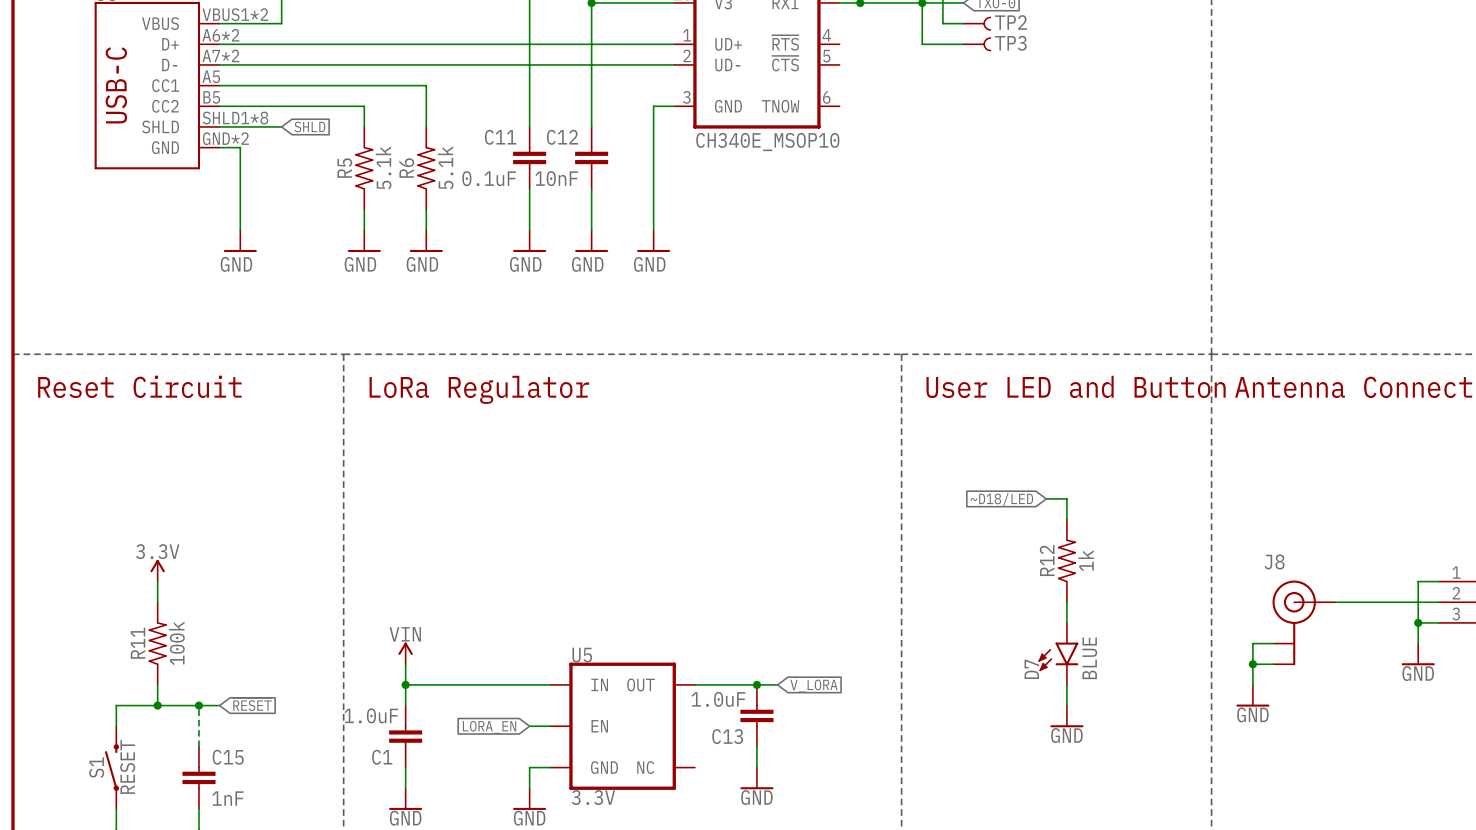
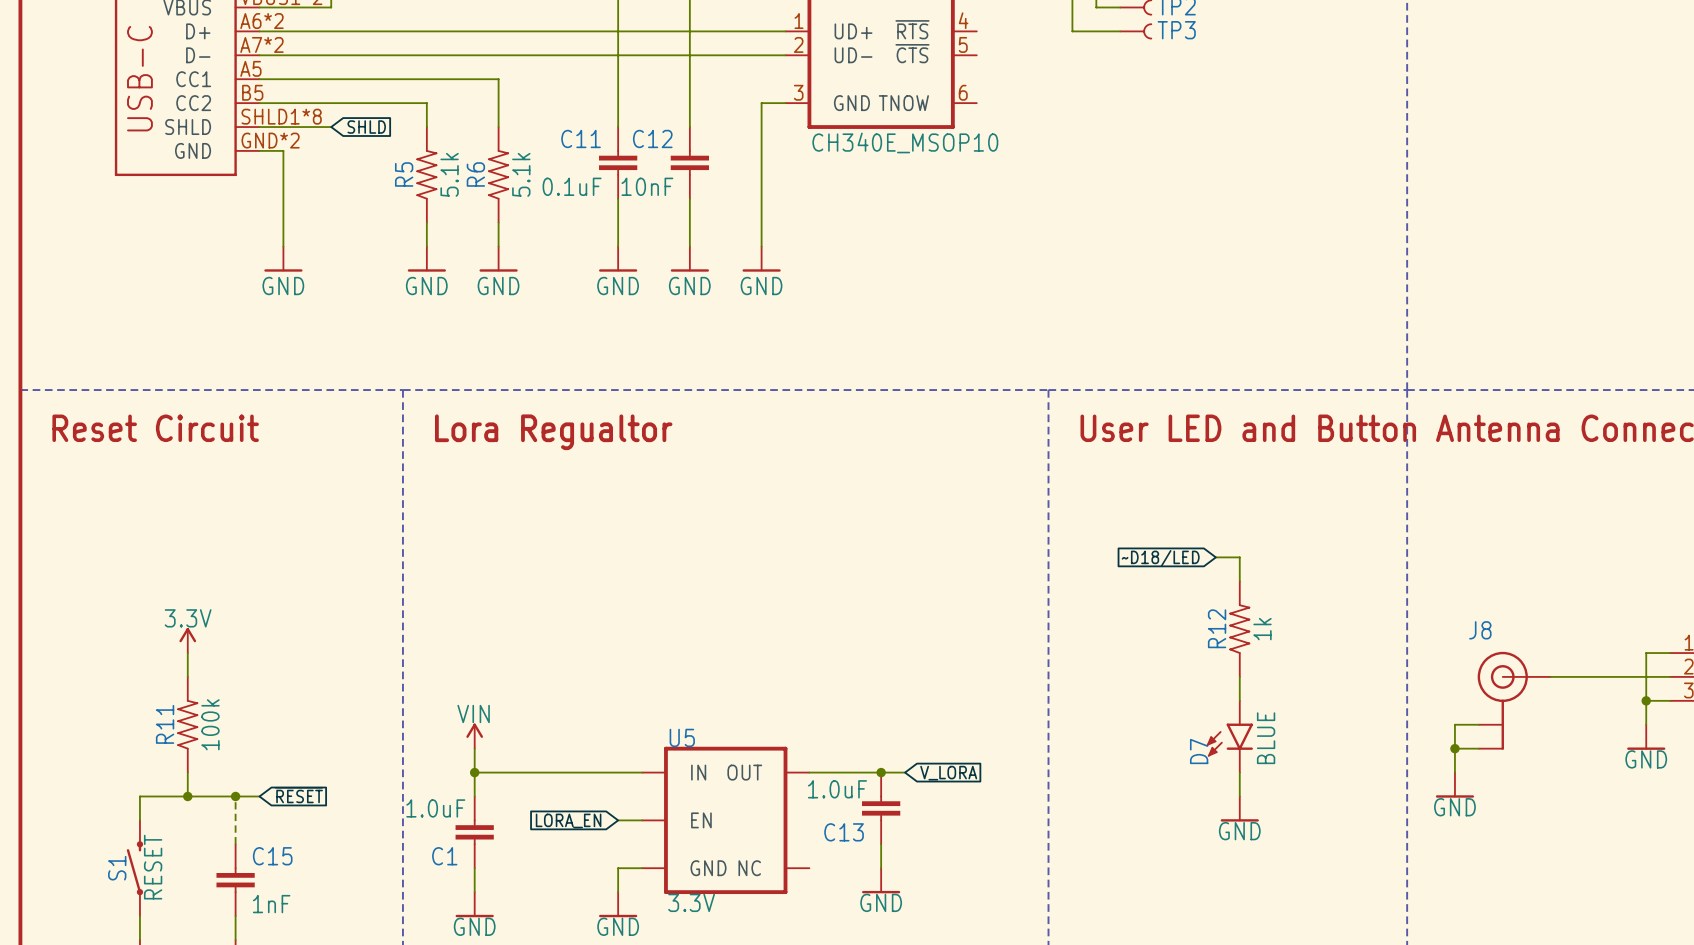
text: LoRa Regulator (479, 389) -> Lora Regualtor (553, 432)

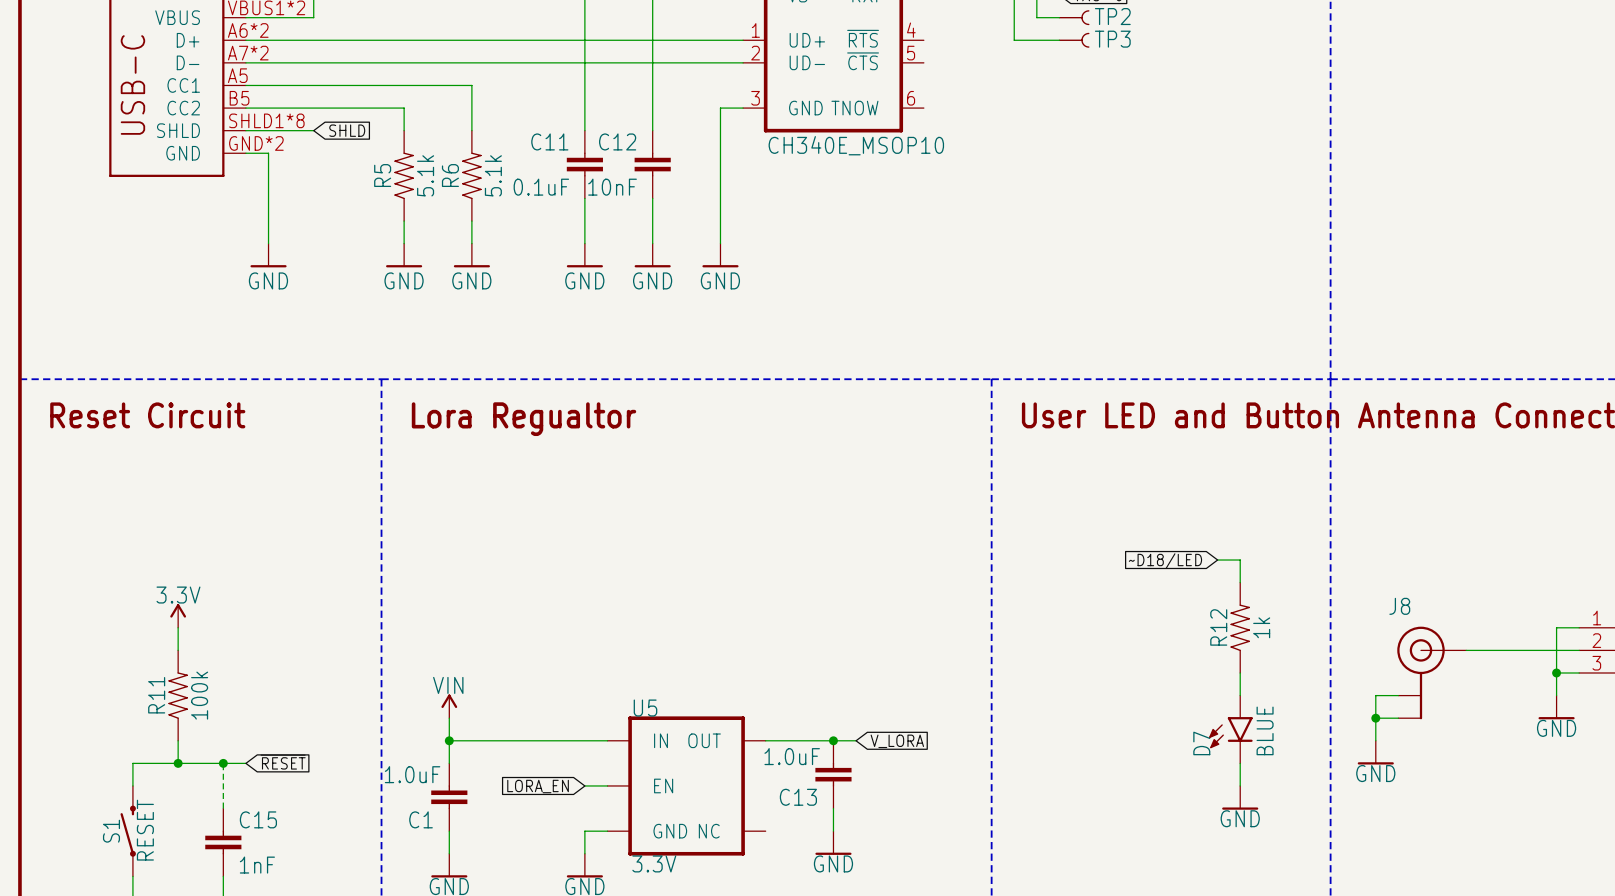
wire: (1215, 557) (1239, 557) (1239, 581) -> (1217, 560) (1240, 560) (1240, 582)
global label position: ~D18/LED (1160, 558) -> ~D18/LED (1165, 561)
R12 position: (1239, 629) -> (1240, 627)
wire: (1239, 676) (1239, 700) -> (1240, 672) (1240, 695)
D7 position: (1229, 736) -> (1230, 729)
wire: (1239, 772) (1239, 796) -> (1240, 763) (1240, 785)
power symbol position: GND (1239, 809) -> GND (1240, 797)

